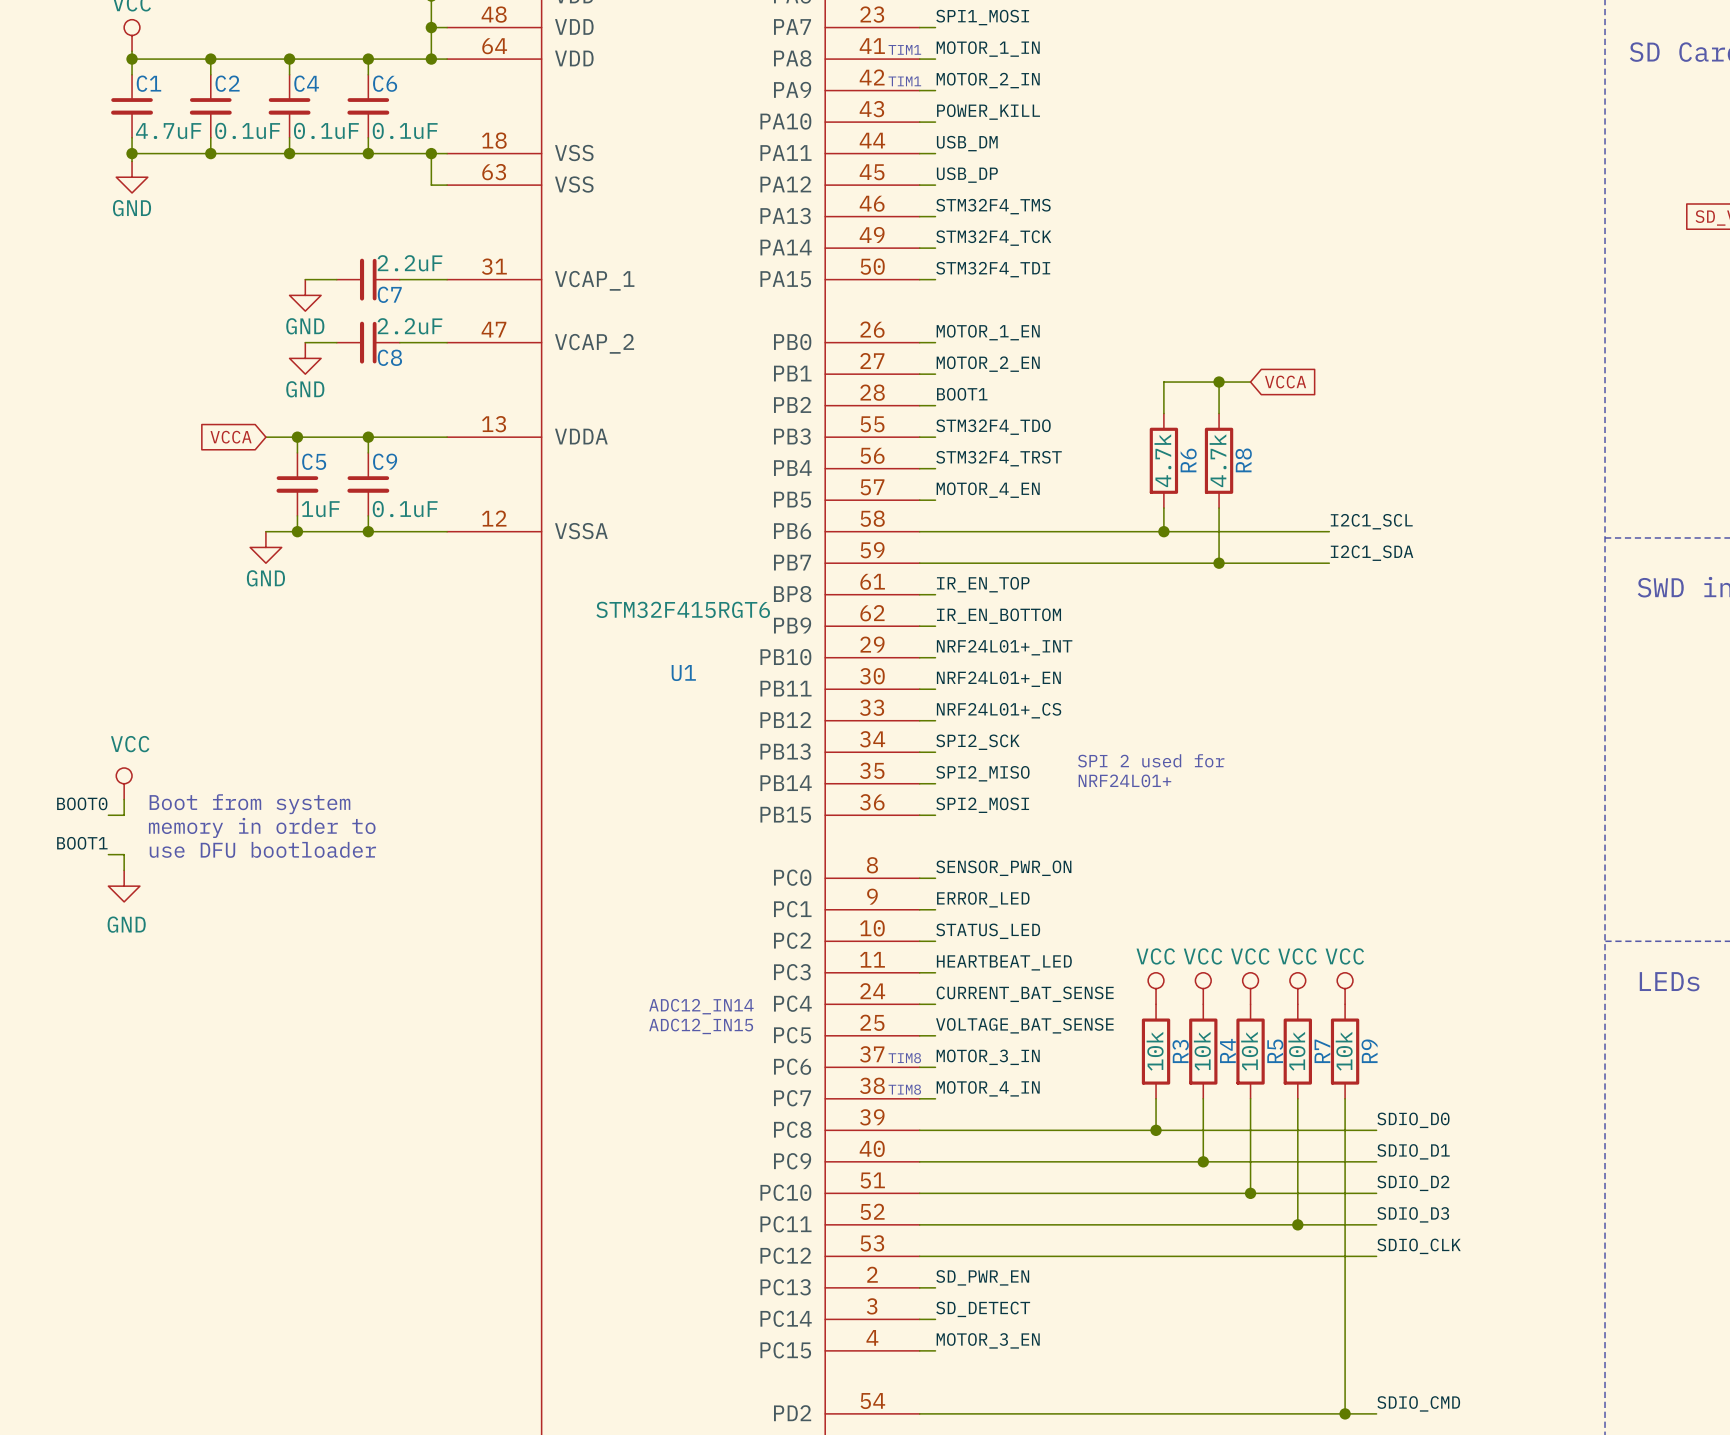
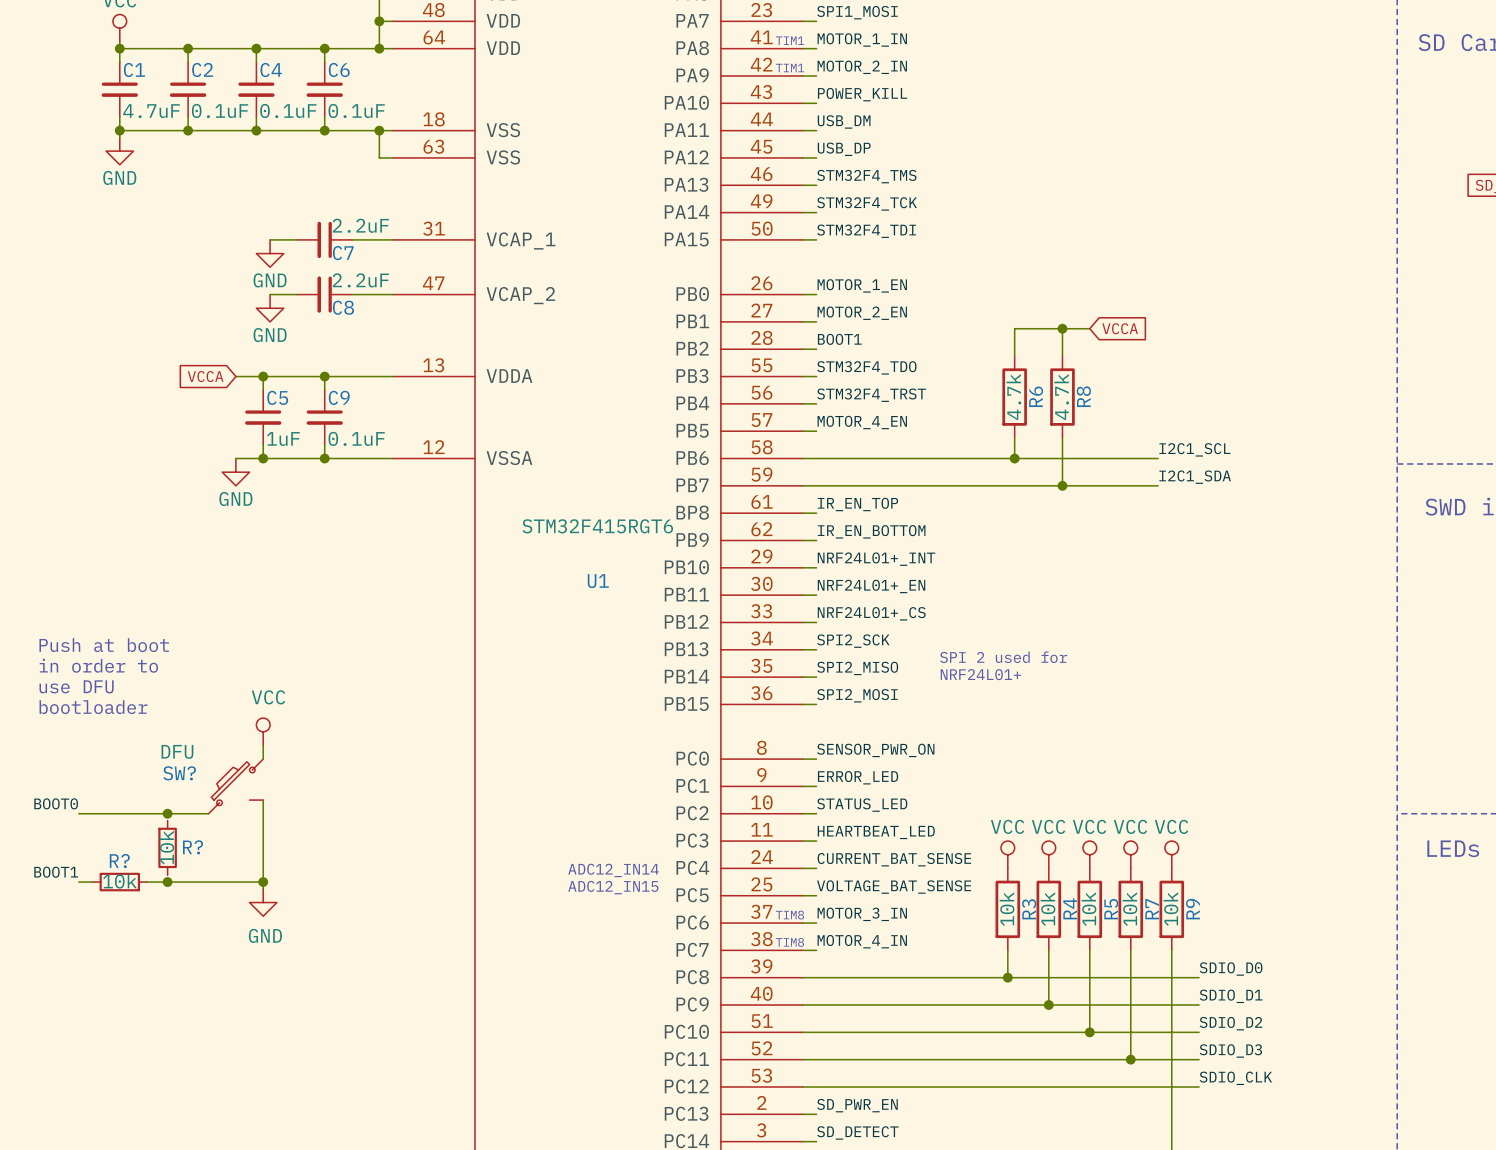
text: none -> Push at boot (104, 645)
text: none -> in order to (98, 665)
power symbol position: VCC (124, 783) -> VCC (263, 731)
text: none -> use DFU (76, 686)
wire: (124, 799) (124, 815) (108, 815) -> none
label position: BOOT0 (82, 803) -> BOOT0 (56, 803)
text: Boot from system (249, 804) -> none
text: none -> bootloader (93, 707)
text: memory in order to (262, 827) -> none
label position: BOOT1 (82, 843) -> BOOT1 (56, 872)
text: use DFU bootloader (262, 849) -> none
wire: (108, 854) (124, 854) (124, 870) -> none
wire: none -> (263, 745) (263, 759)
power symbol position: GND (124, 886) -> GND (263, 902)
SW?: none -> DFU (235, 786)
wire: none -> (263, 800) (263, 888)
wire: none -> (78, 813) (208, 813)
junction: none -> (167, 813)
R?: none -> 10k (167, 847)
wire: none -> (78, 882) (92, 882)
R?: none -> 10k (119, 882)
wire: none -> (147, 882) (263, 882)
junction: none -> (167, 882)
junction: none -> (263, 882)

